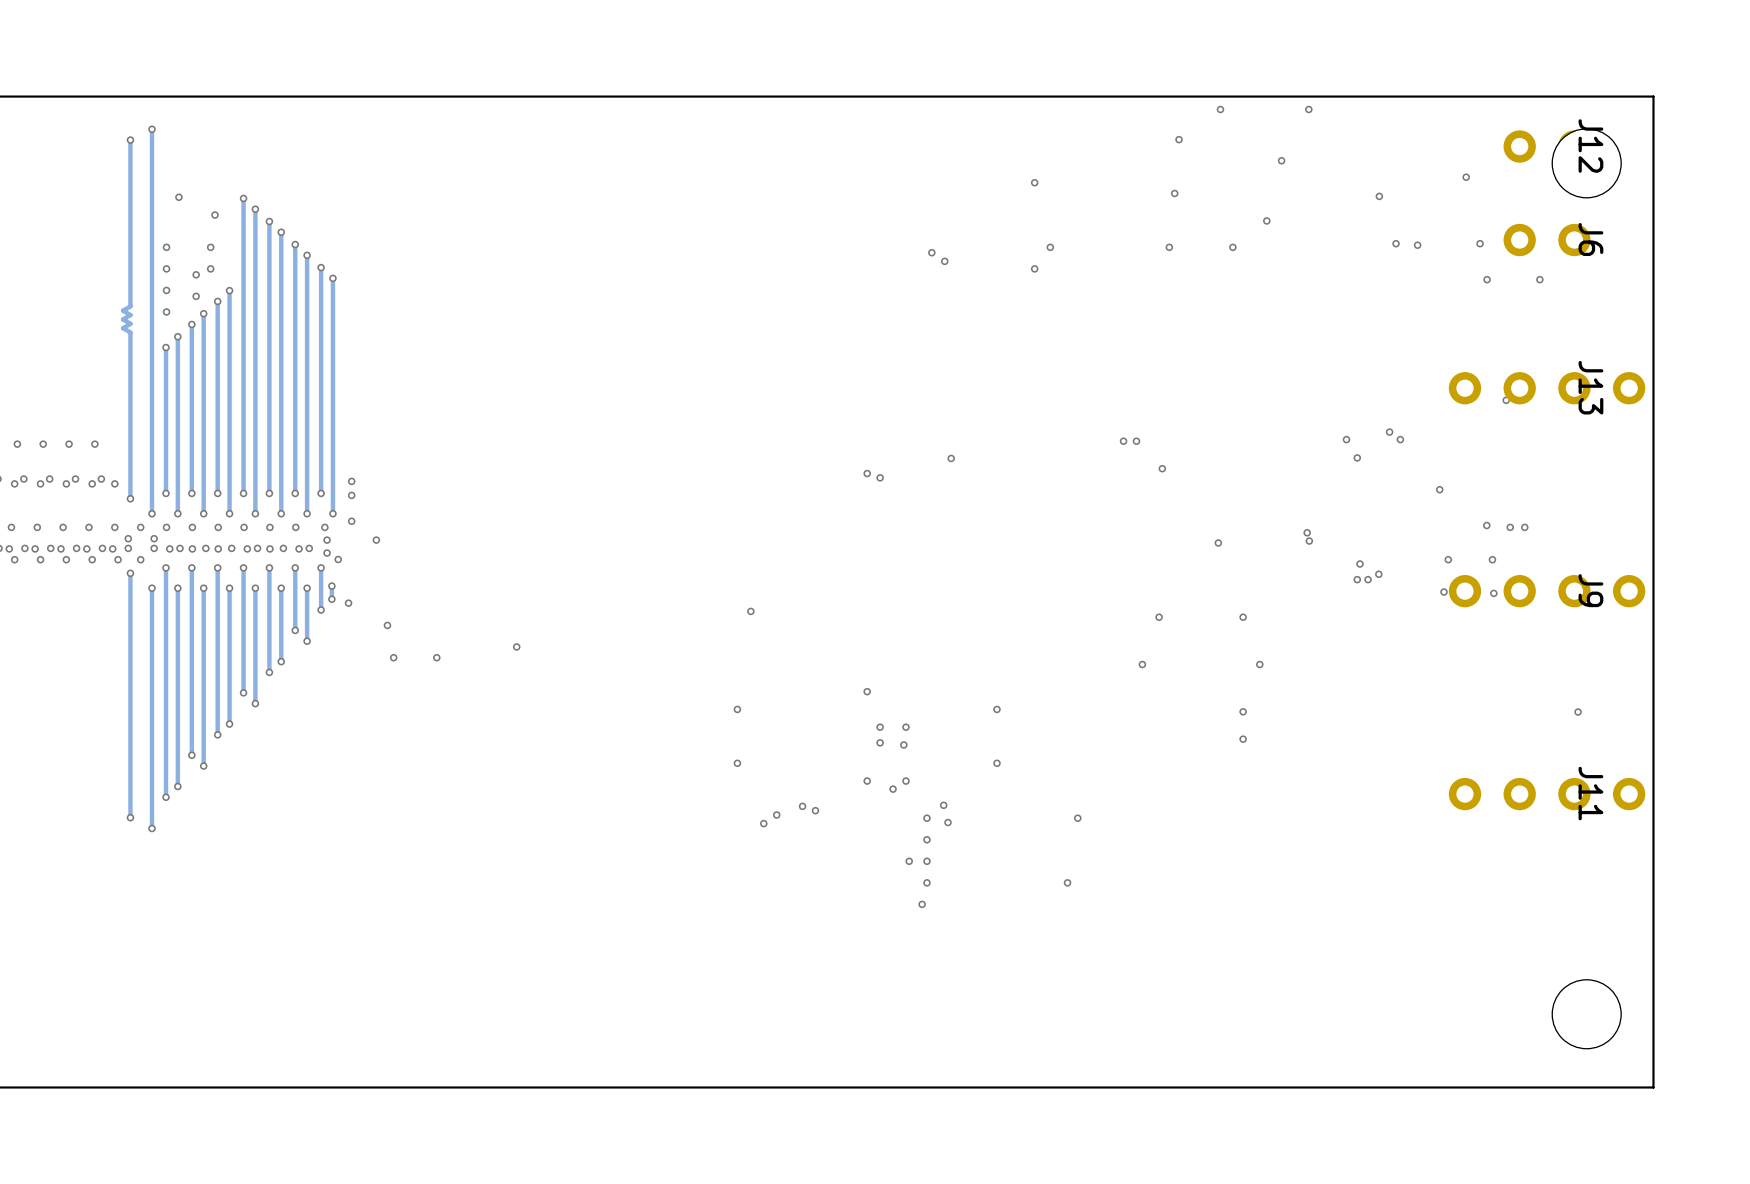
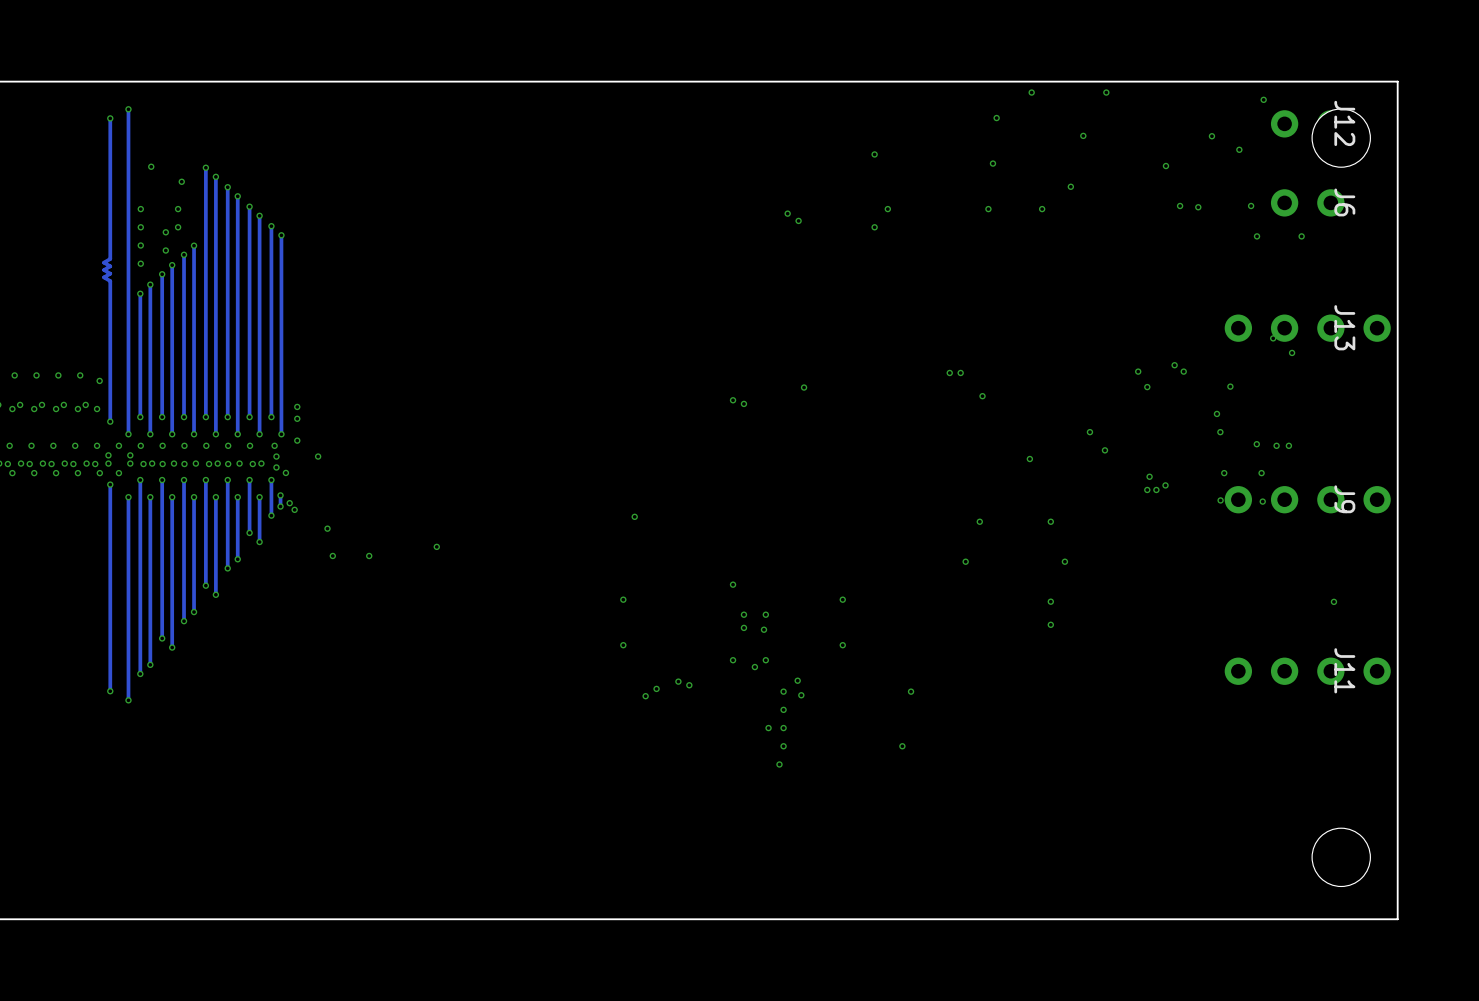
via: none -> (1263, 99)
via: none -> (1211, 136)
via: none -> (1292, 352)
via: none -> (99, 380)
via: none -> (1230, 386)
via: none -> (1220, 432)
via position: (1309, 541) -> (1089, 432)
via: none -> (289, 503)

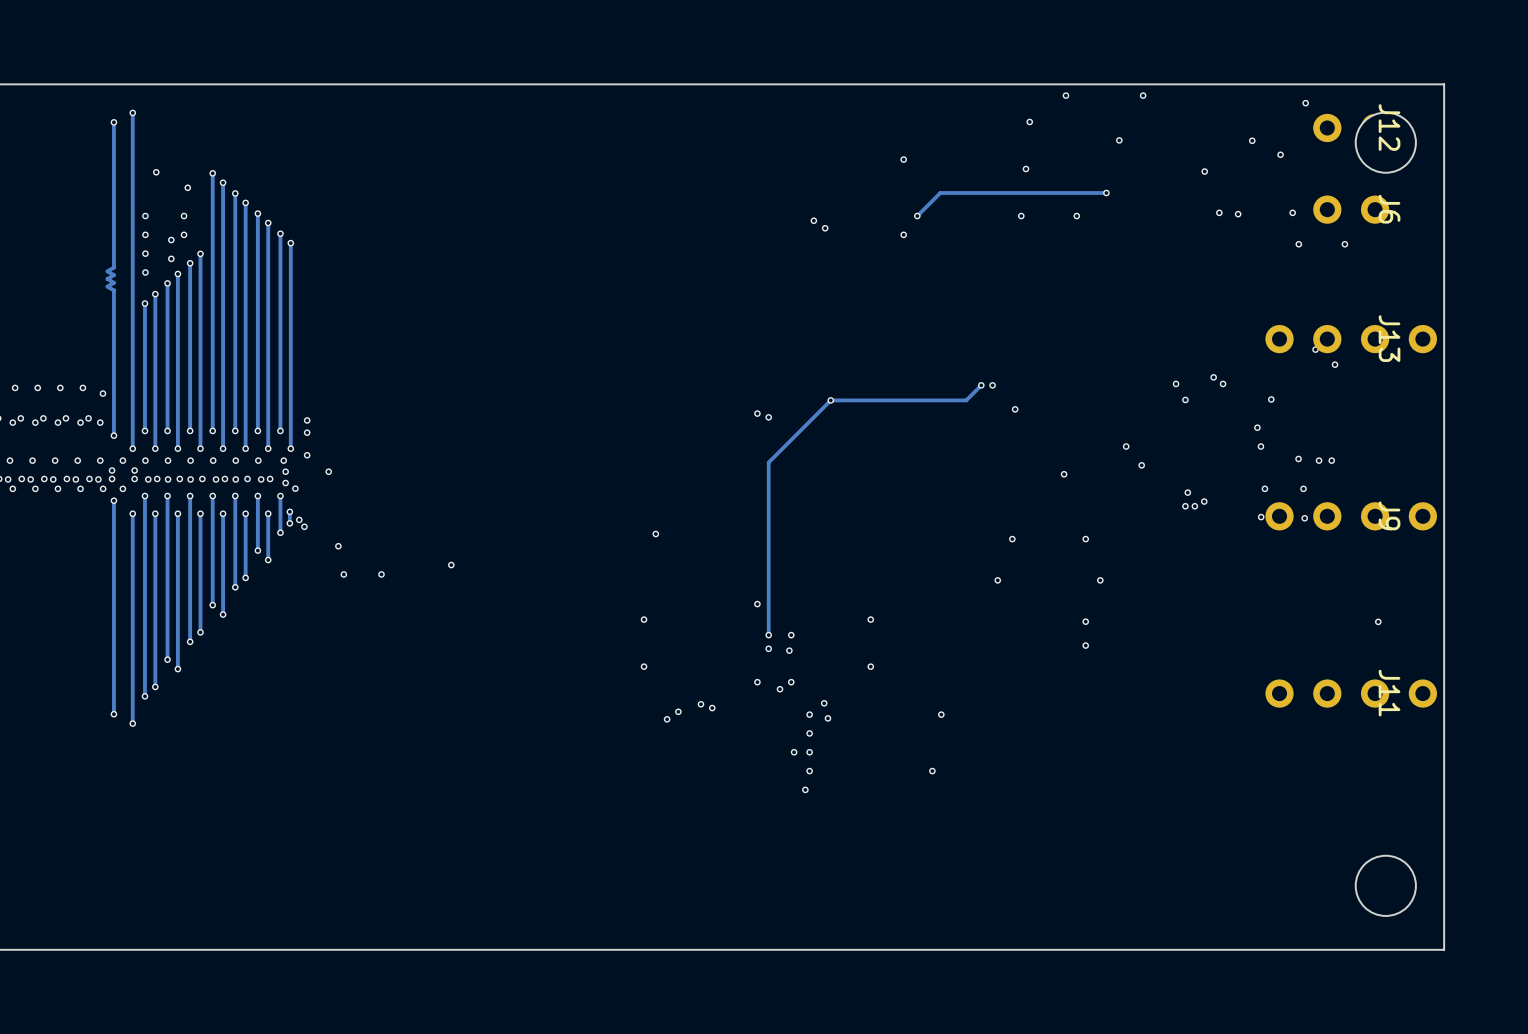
track: none -> (1106, 192) (940, 192) (917, 216)
track: none -> (981, 385) (966, 400) (830, 400) (768, 462) (768, 635)

